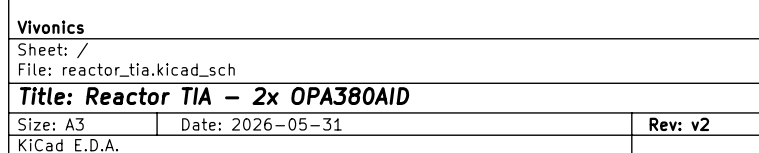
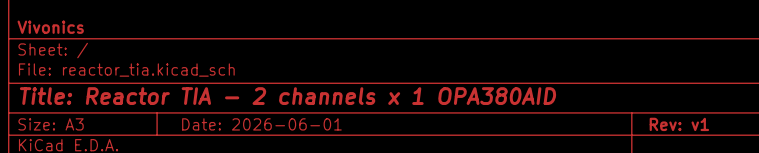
title block: Title: Reactor TIA - 2x OPA380AID (214, 96) -> Title: Reactor TIA - 2 channels x 1 OPA380AID (287, 96)
title block: Date: 2026-05-31 (261, 124) -> Date: 2026-06-01 (261, 124)
title block: Rev: v2 (679, 124) -> Rev: v1 (679, 124)

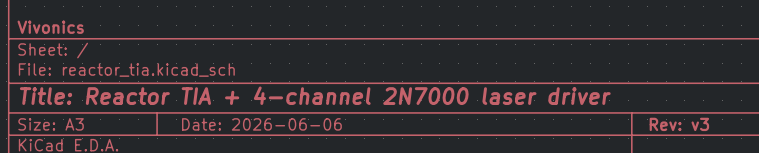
title block: Title: Reactor TIA - 2 channels x 1 OPA380AID (287, 96) -> Title: Reactor TIA + 4-channel 2N7000 laser driver (315, 95)
title block: Date: 2026-06-01 (261, 124) -> Date: 2026-06-06 (261, 124)
title block: Rev: v1 (679, 124) -> Rev: v3 (679, 124)

